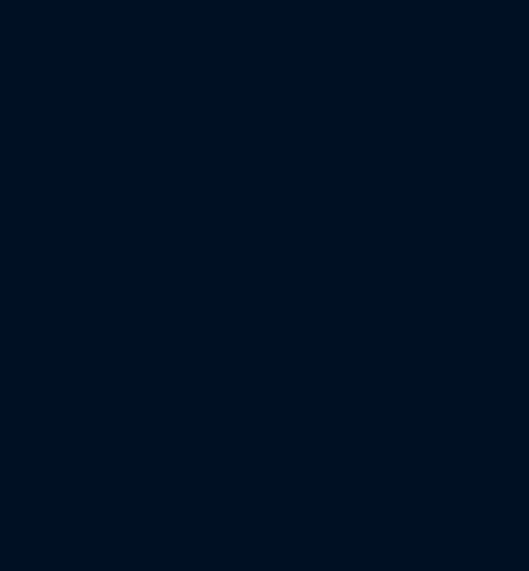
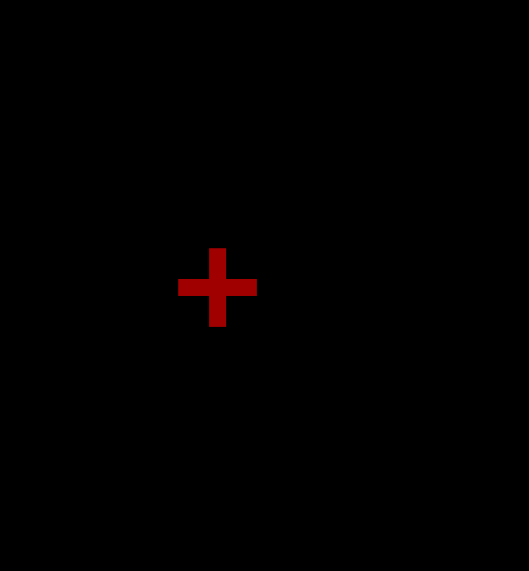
text: none -> + (217, 287)

